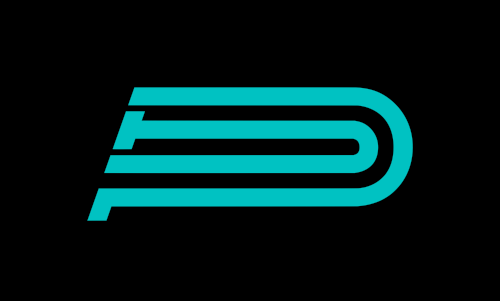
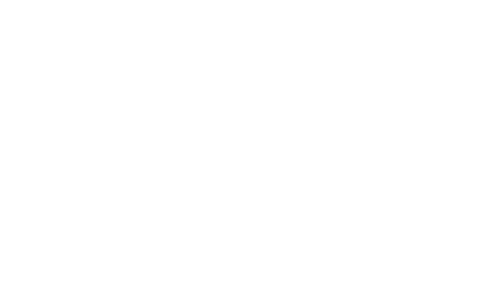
drawing: [87, 87, 413, 221] -> none

